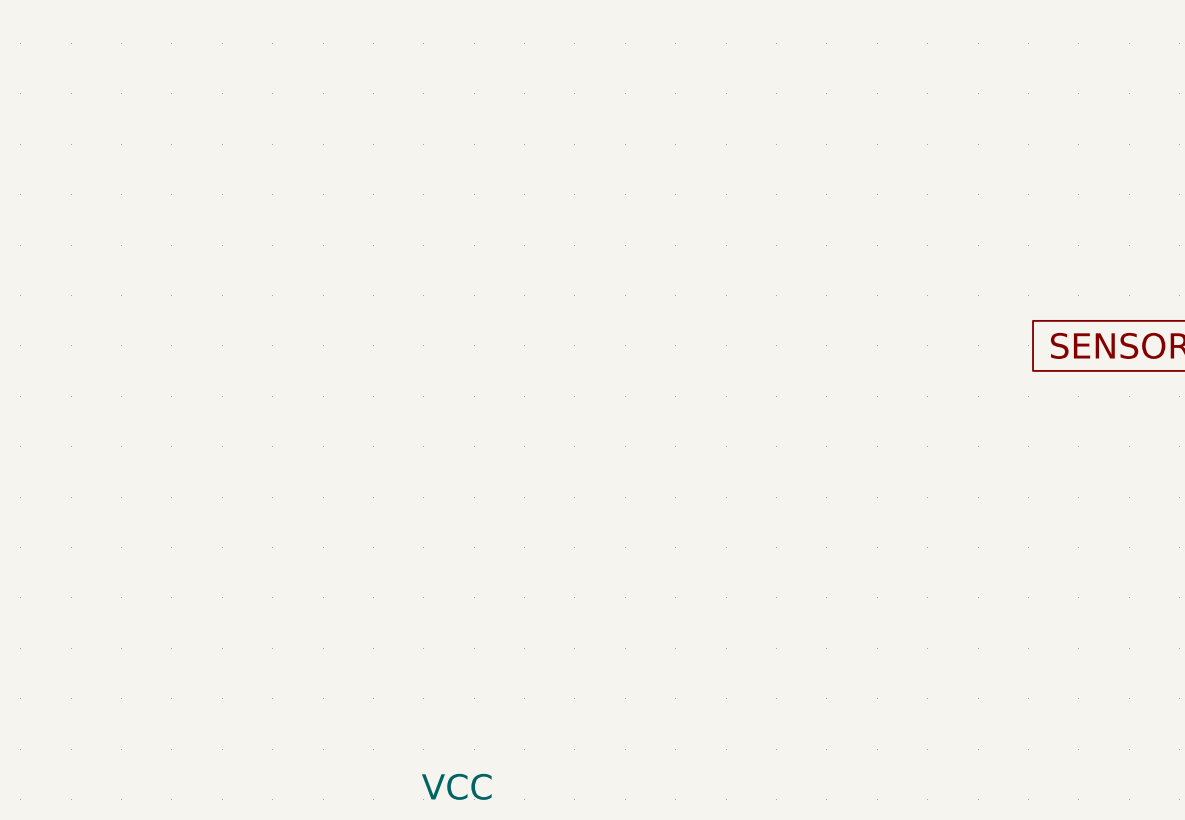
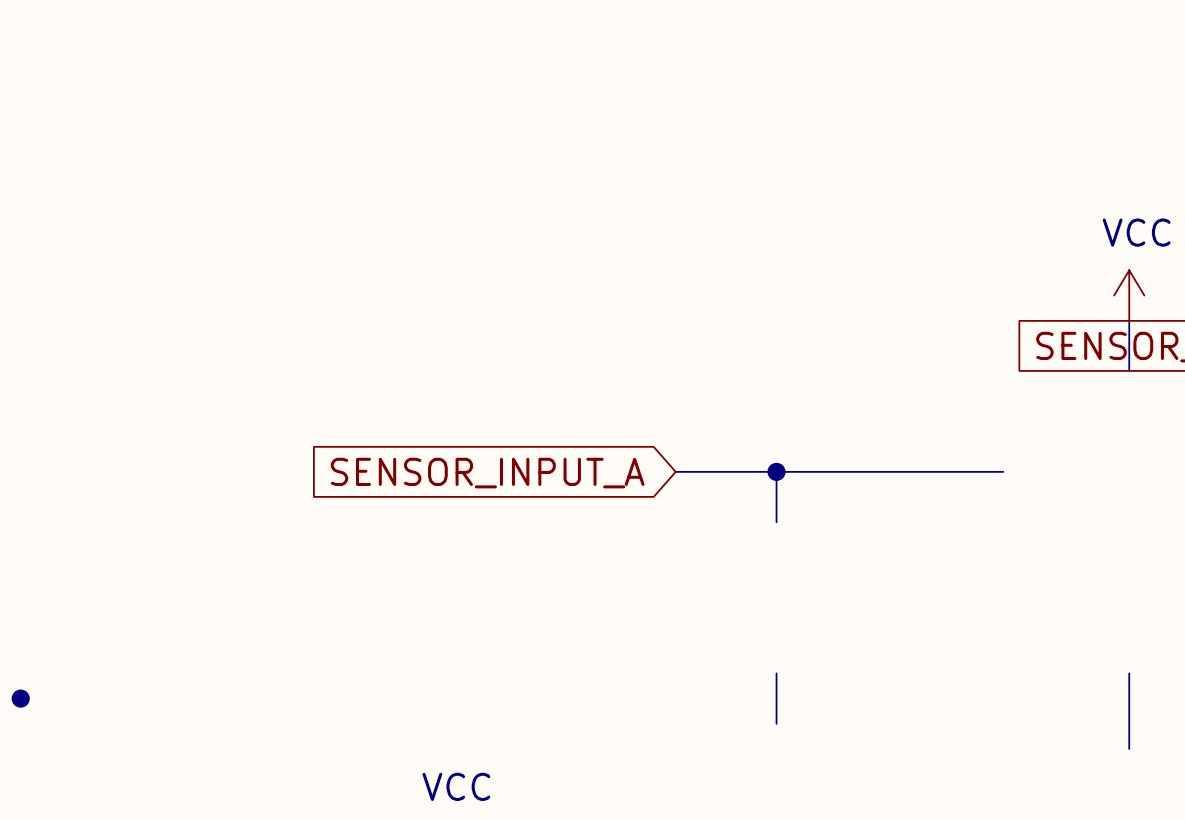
power symbol: none -> VCC (1129, 295)
wire: none -> (1129, 320) (1129, 371)
wire: none -> (675, 471) (1003, 471)
wire: none -> (776, 471) (776, 522)
junction: none -> (776, 471)
global label: none -> SENSOR_INPUT_A (487, 473)
wire: none -> (776, 673) (776, 723)
wire: none -> (1129, 673) (1129, 749)
junction: none -> (20, 698)

